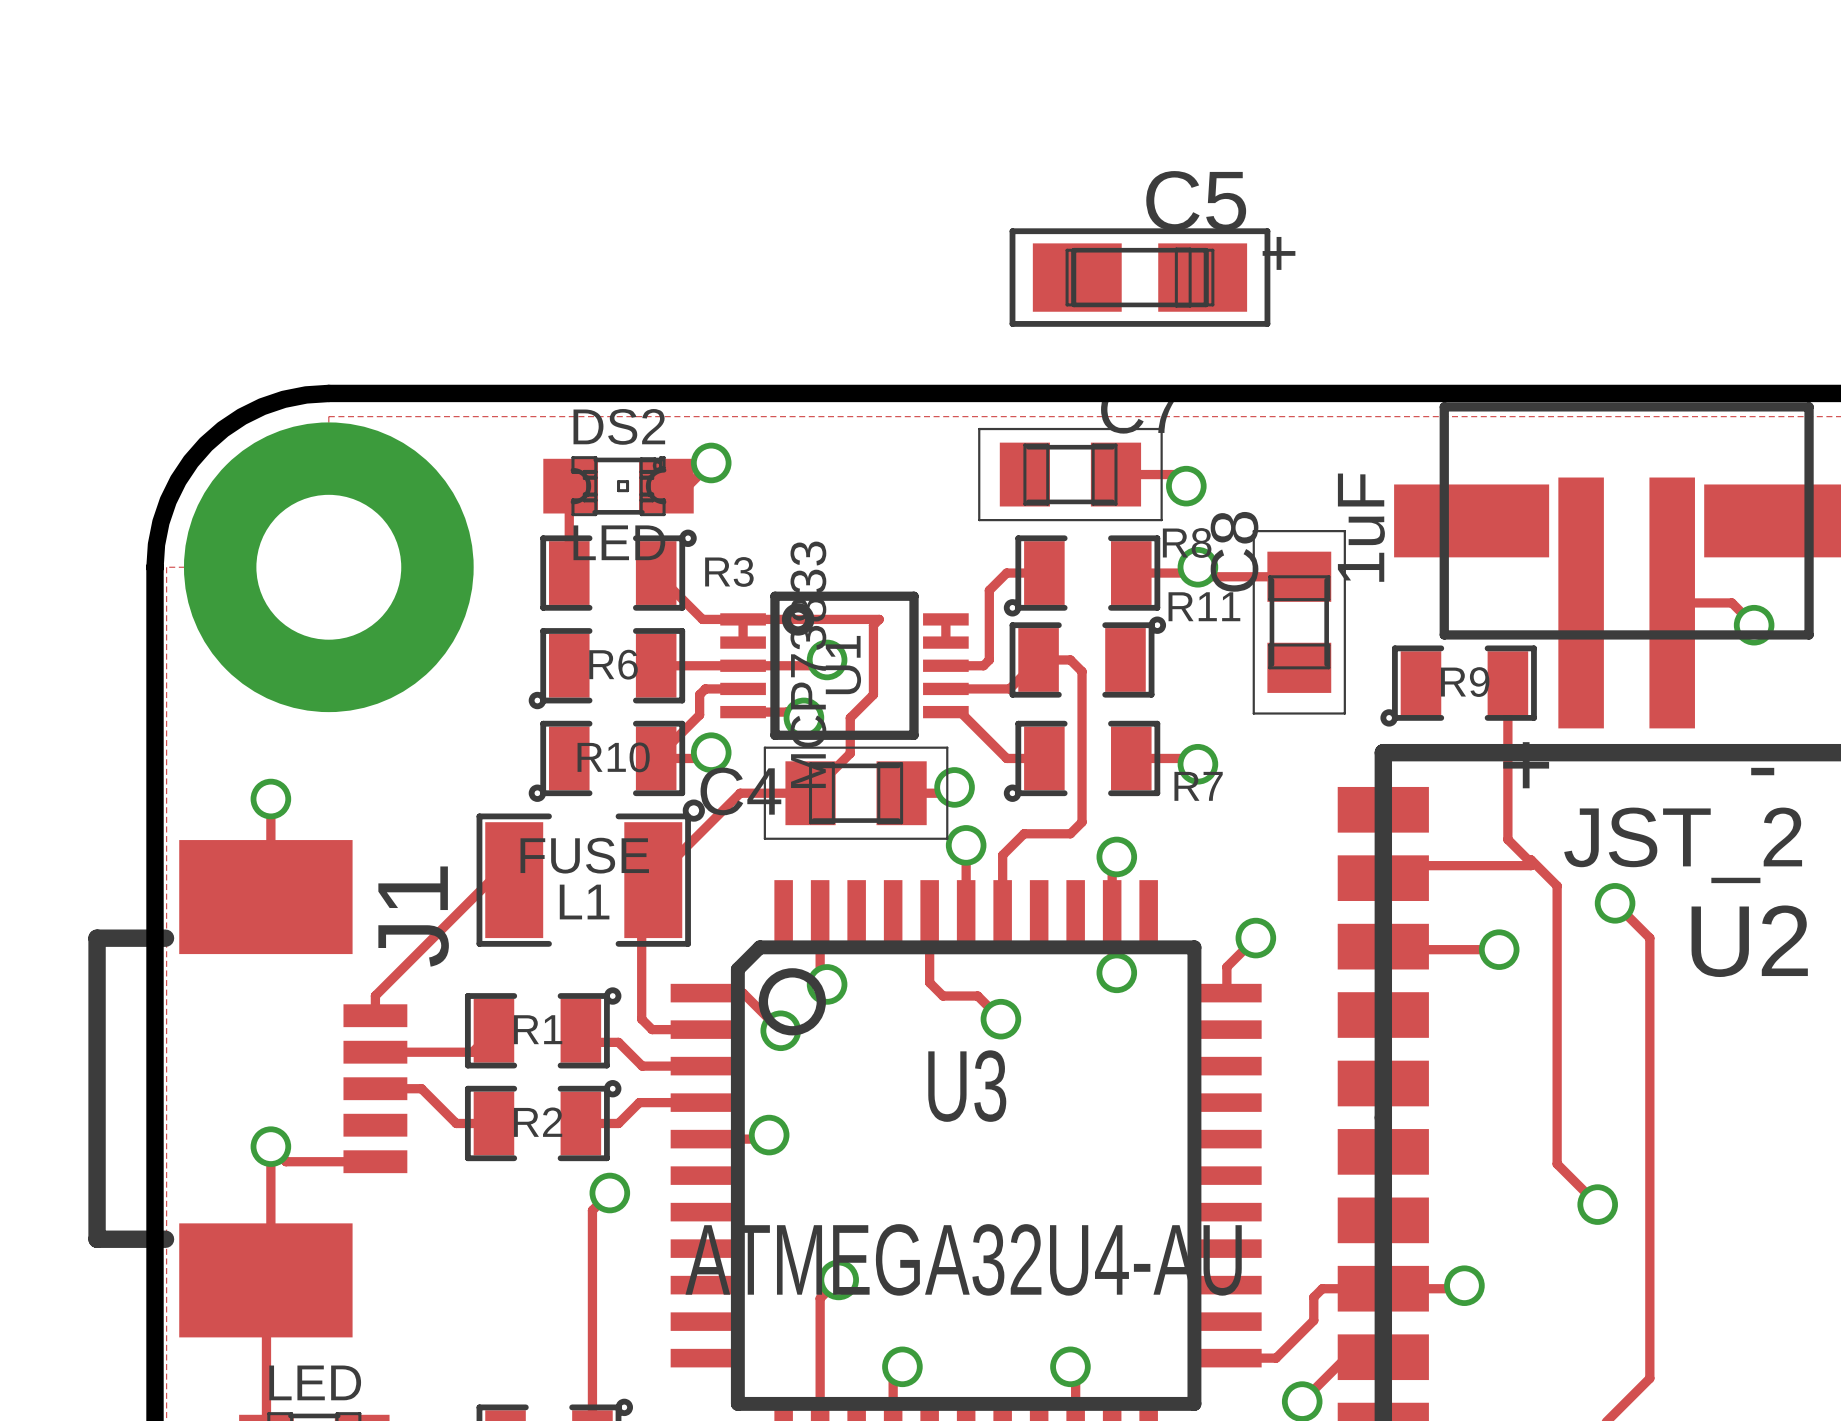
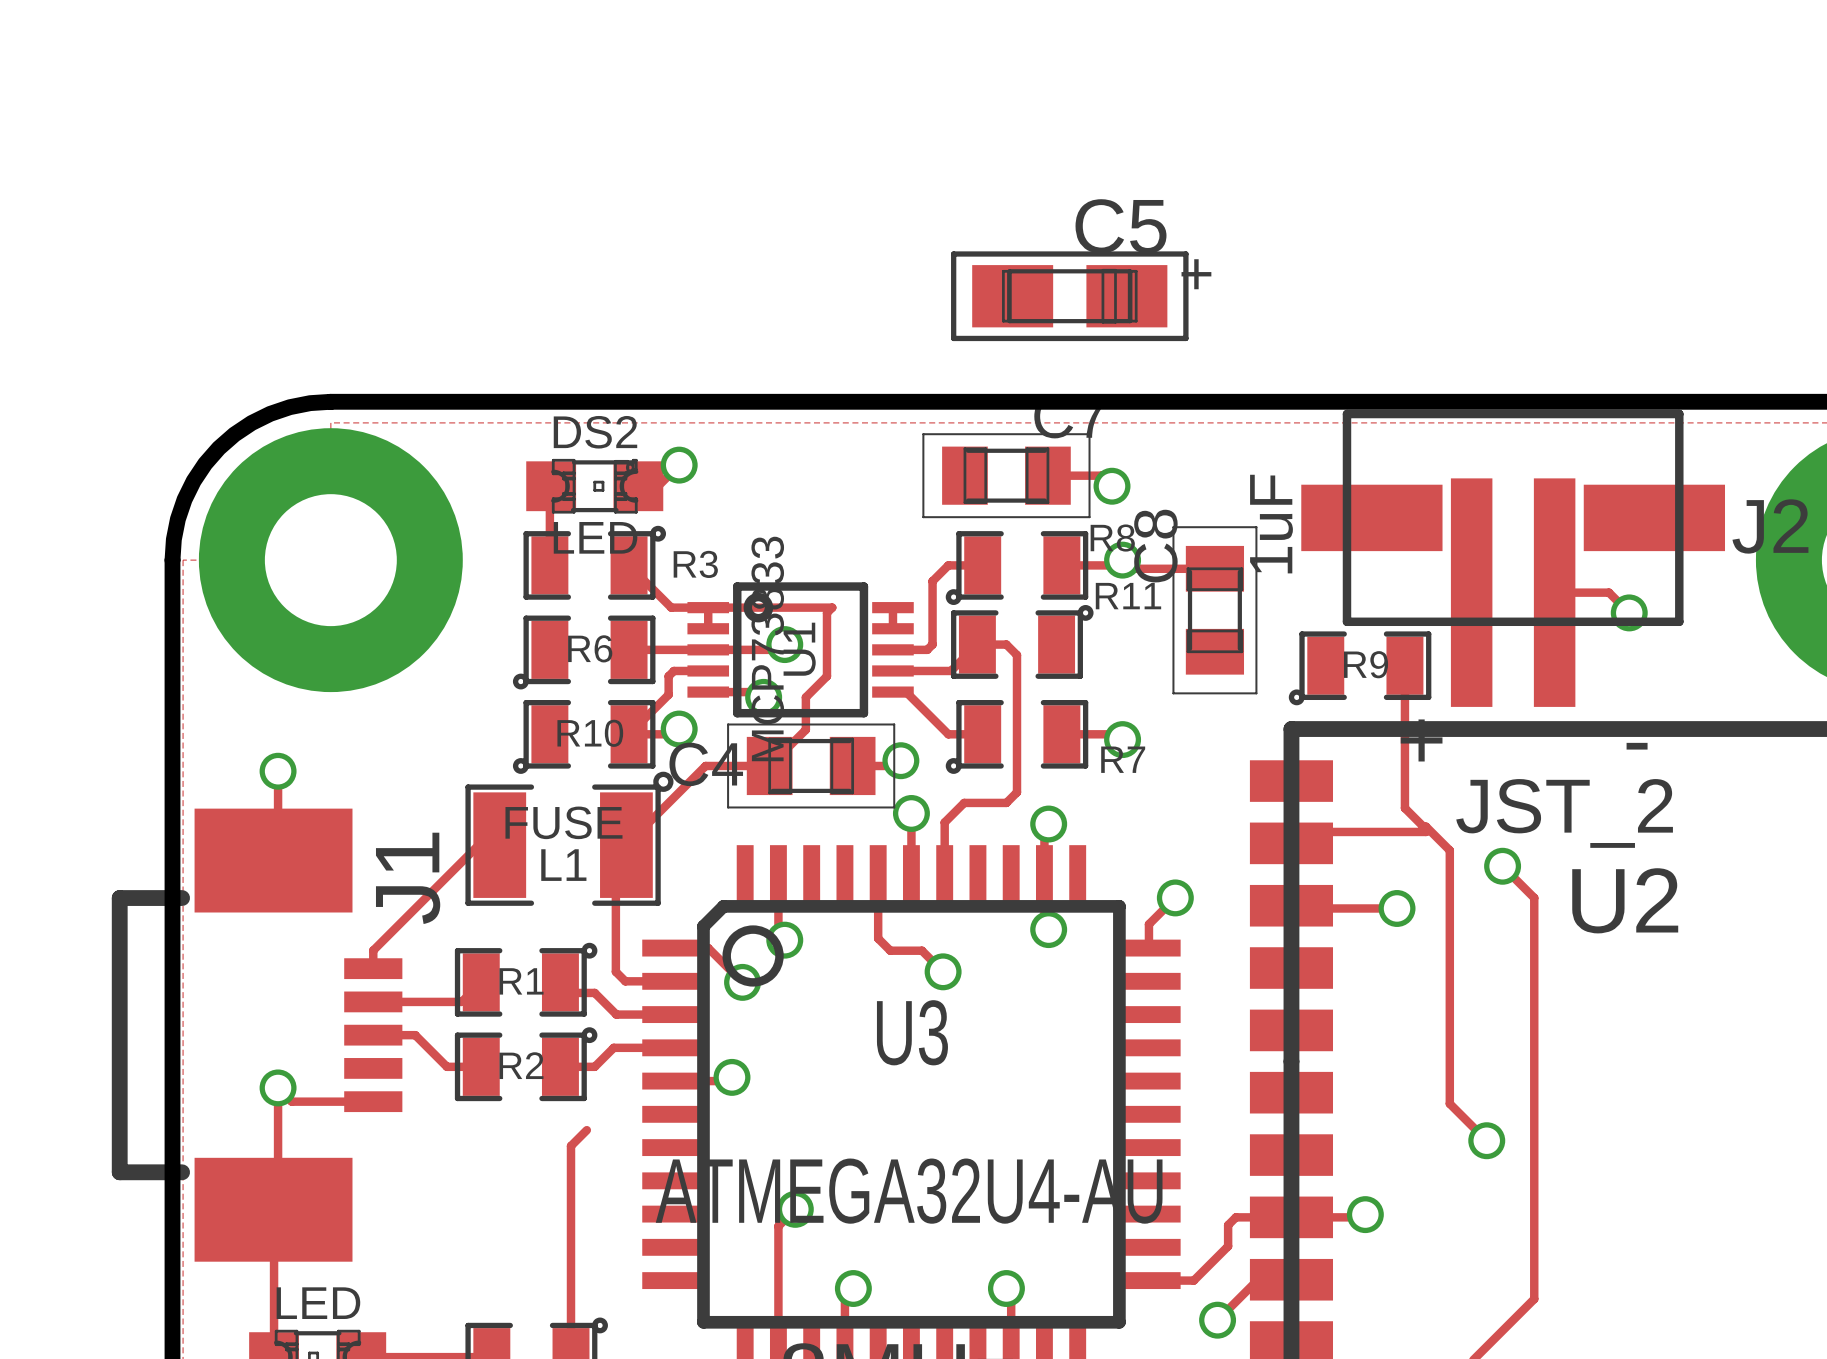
via: (609, 1193) -> none

